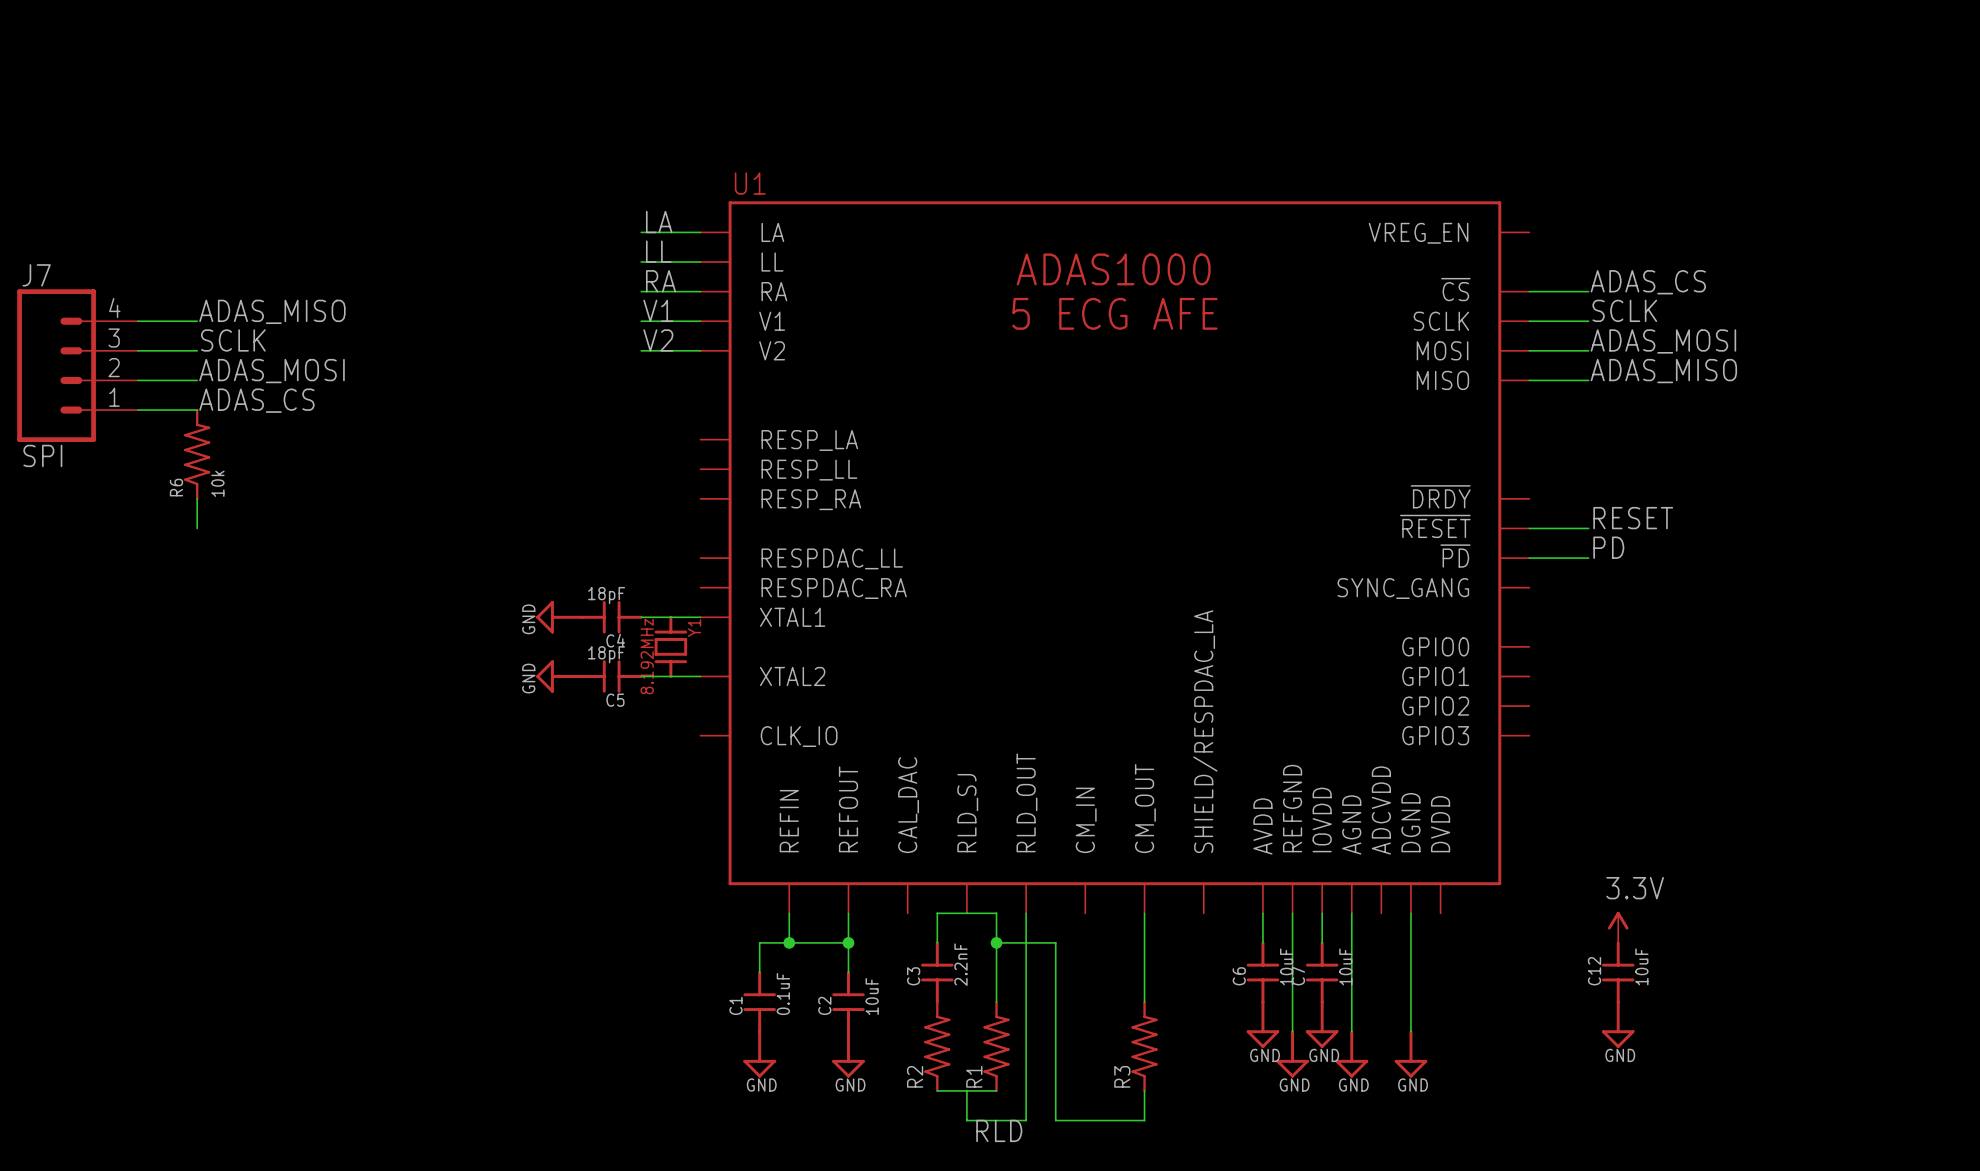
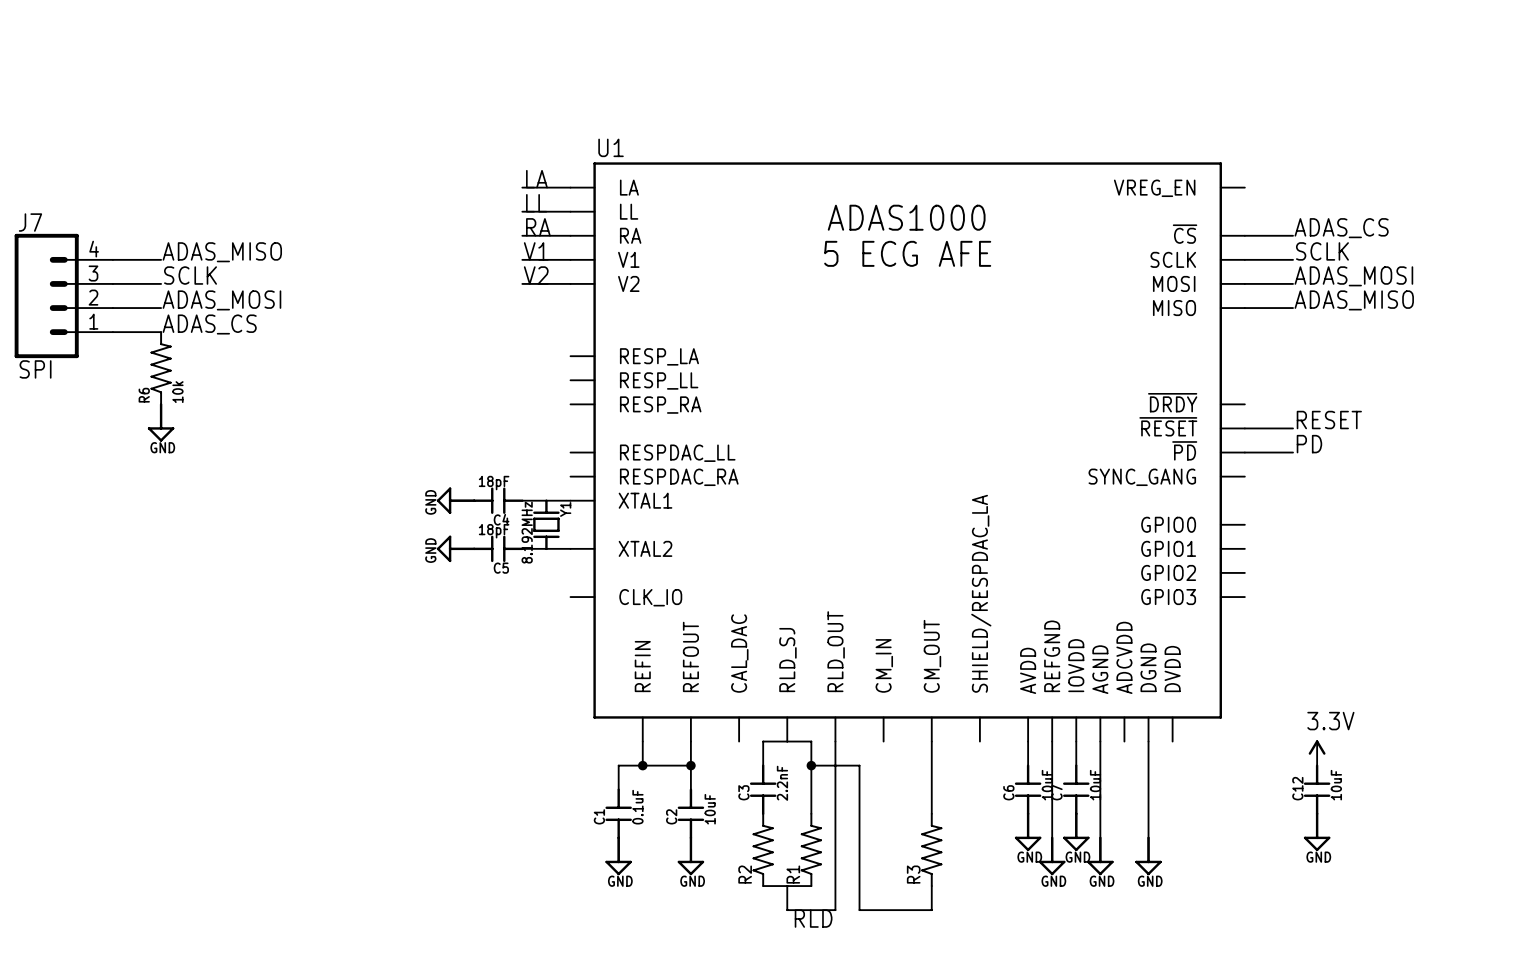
power symbol: none -> GND (161, 422)

